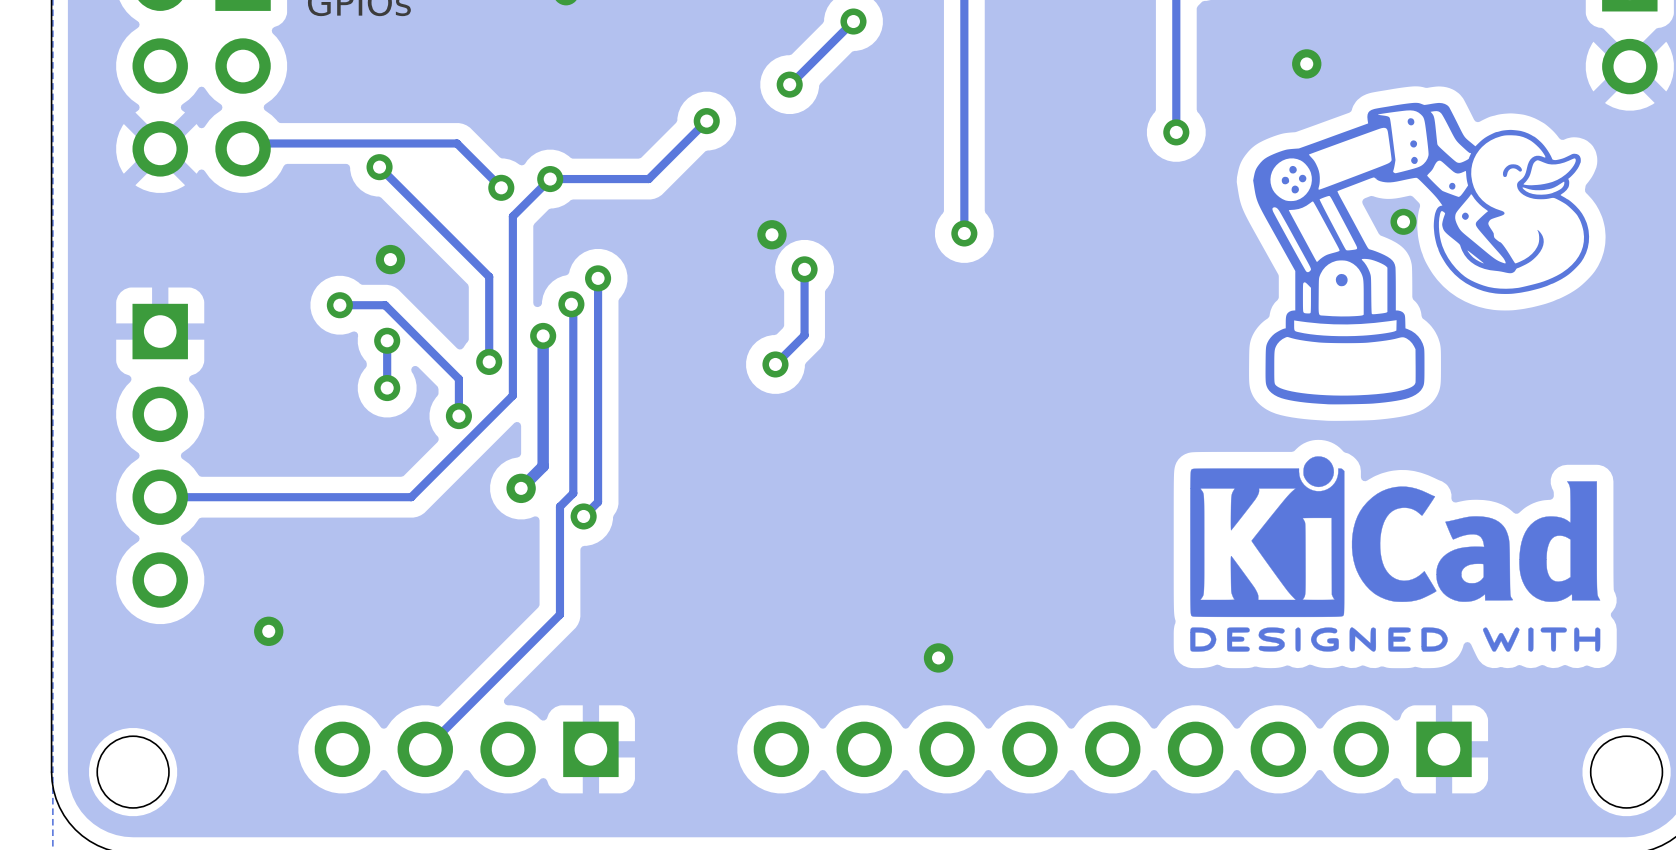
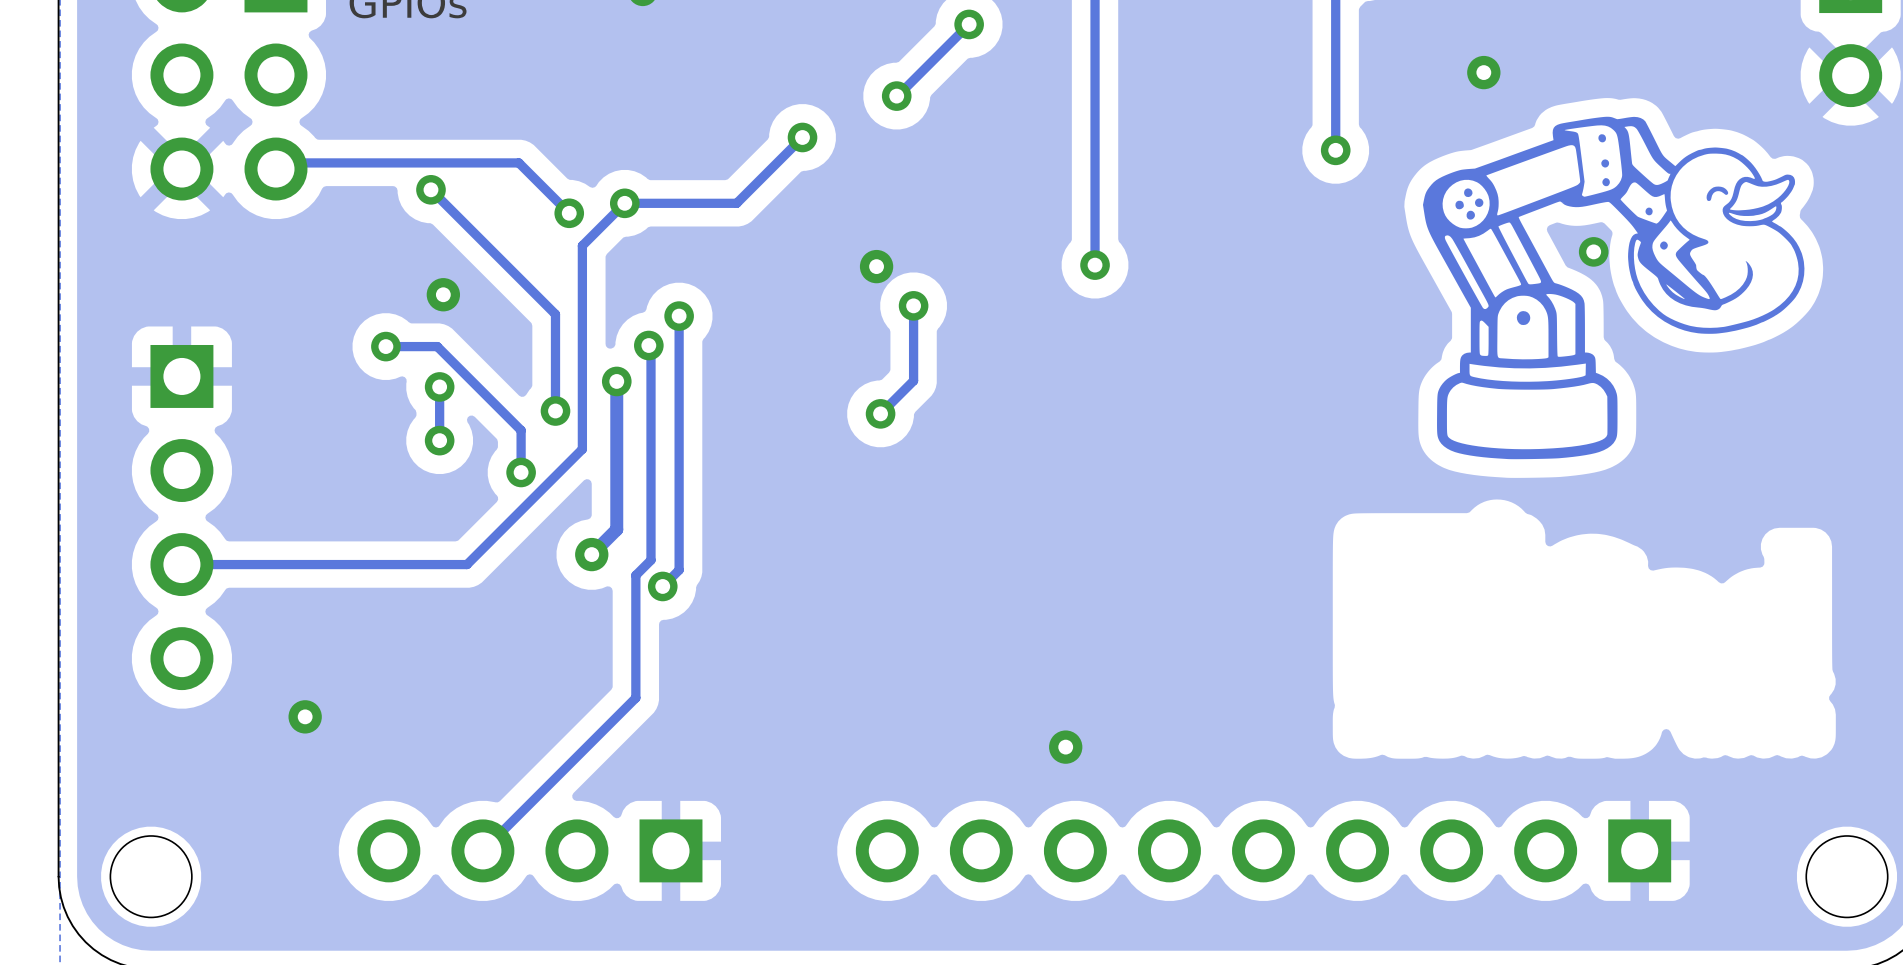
drawing: [1190, 456, 1601, 652] -> none

